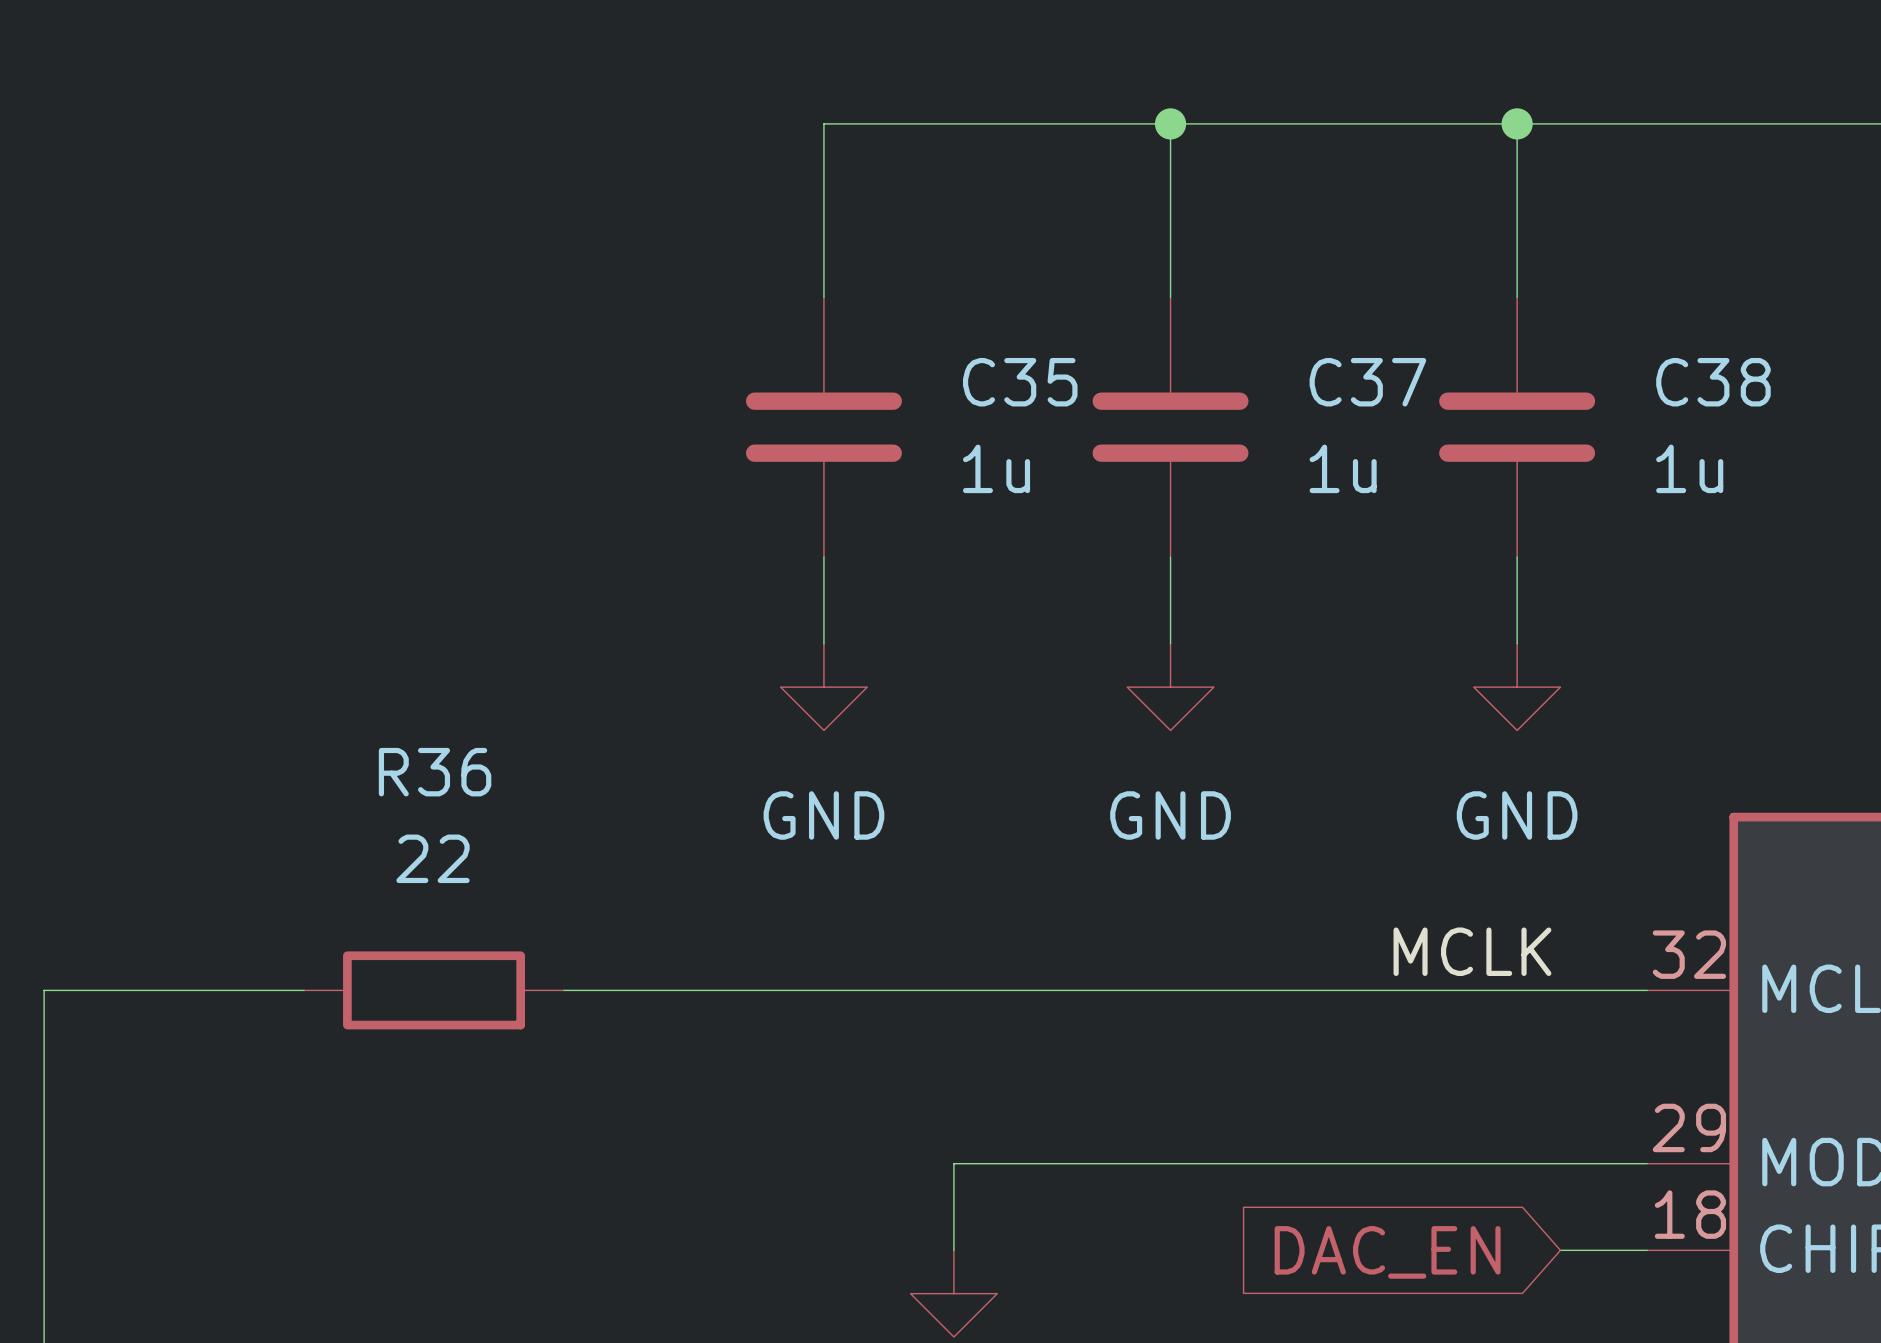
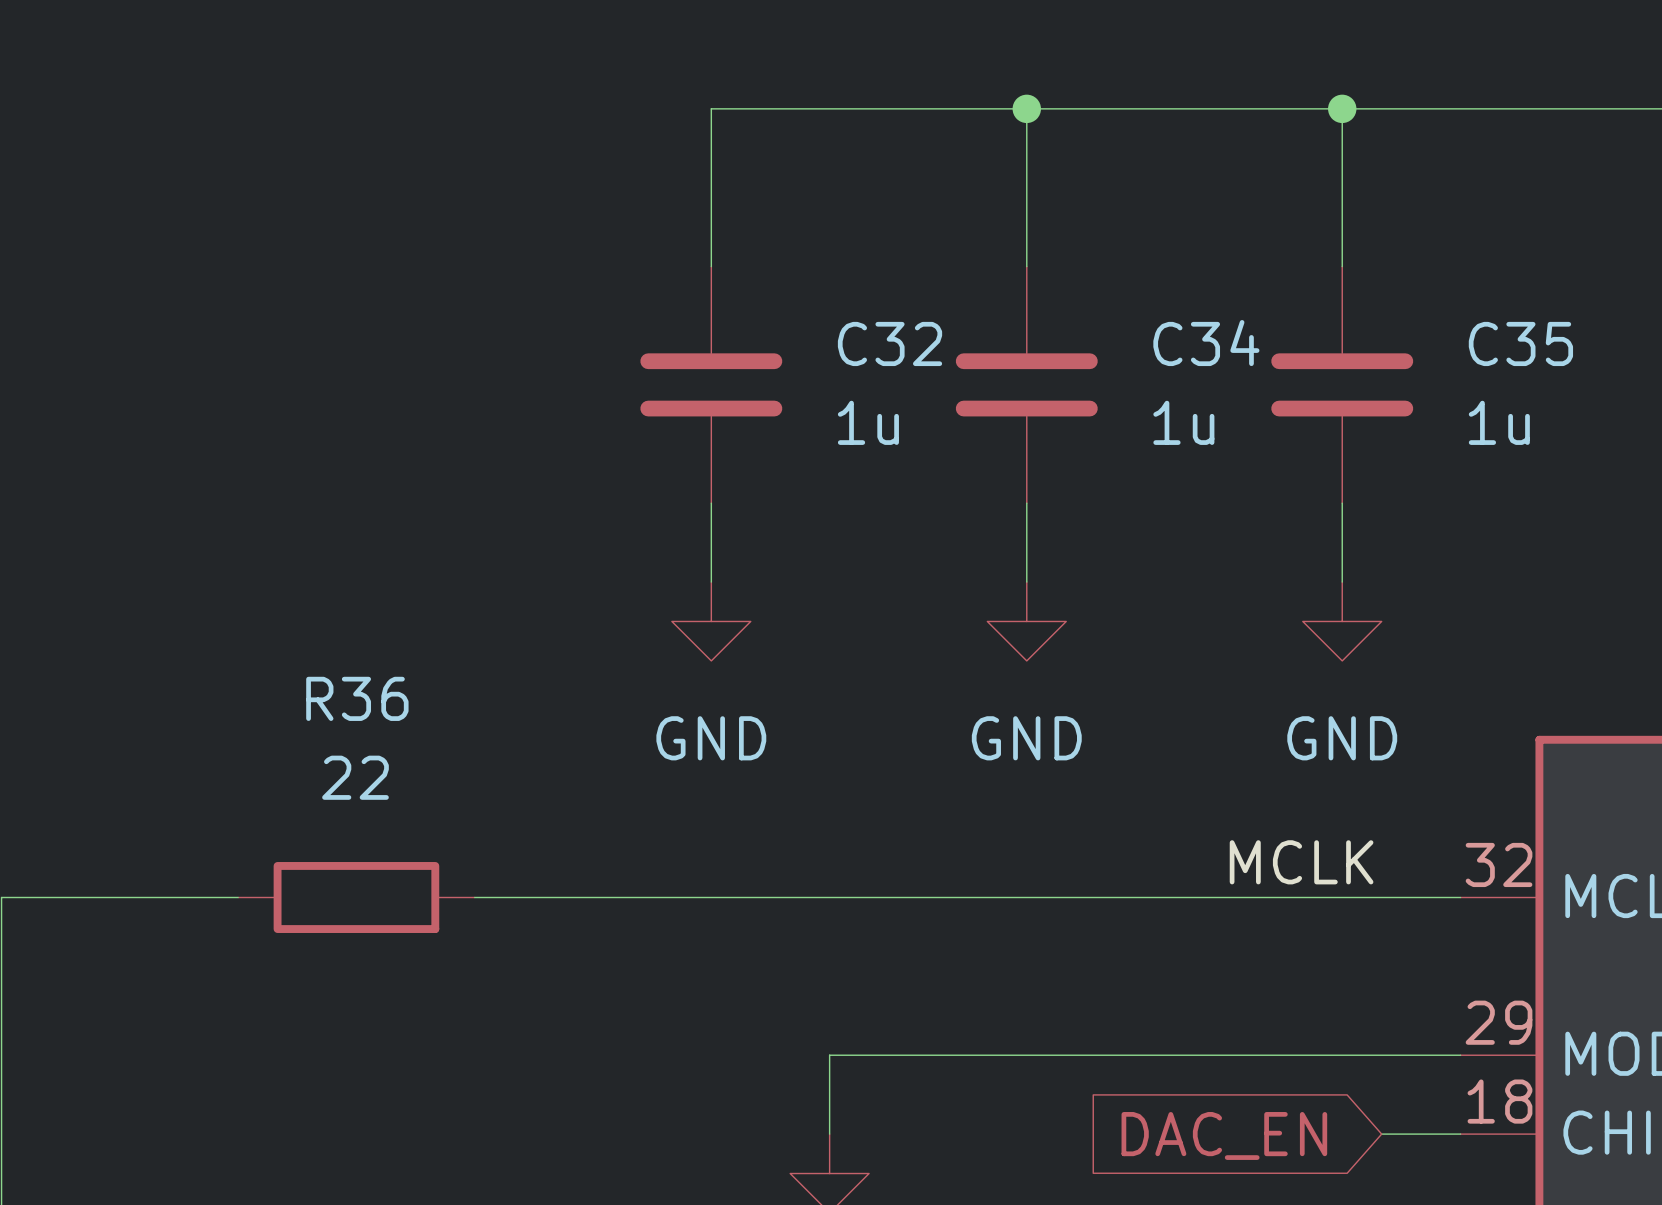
C35 name: C35 (1020, 382) -> C32 (890, 343)
C37 name: C37 (1367, 382) -> C34 (1206, 343)
C38 name: C38 (1713, 382) -> C35 (1520, 343)

